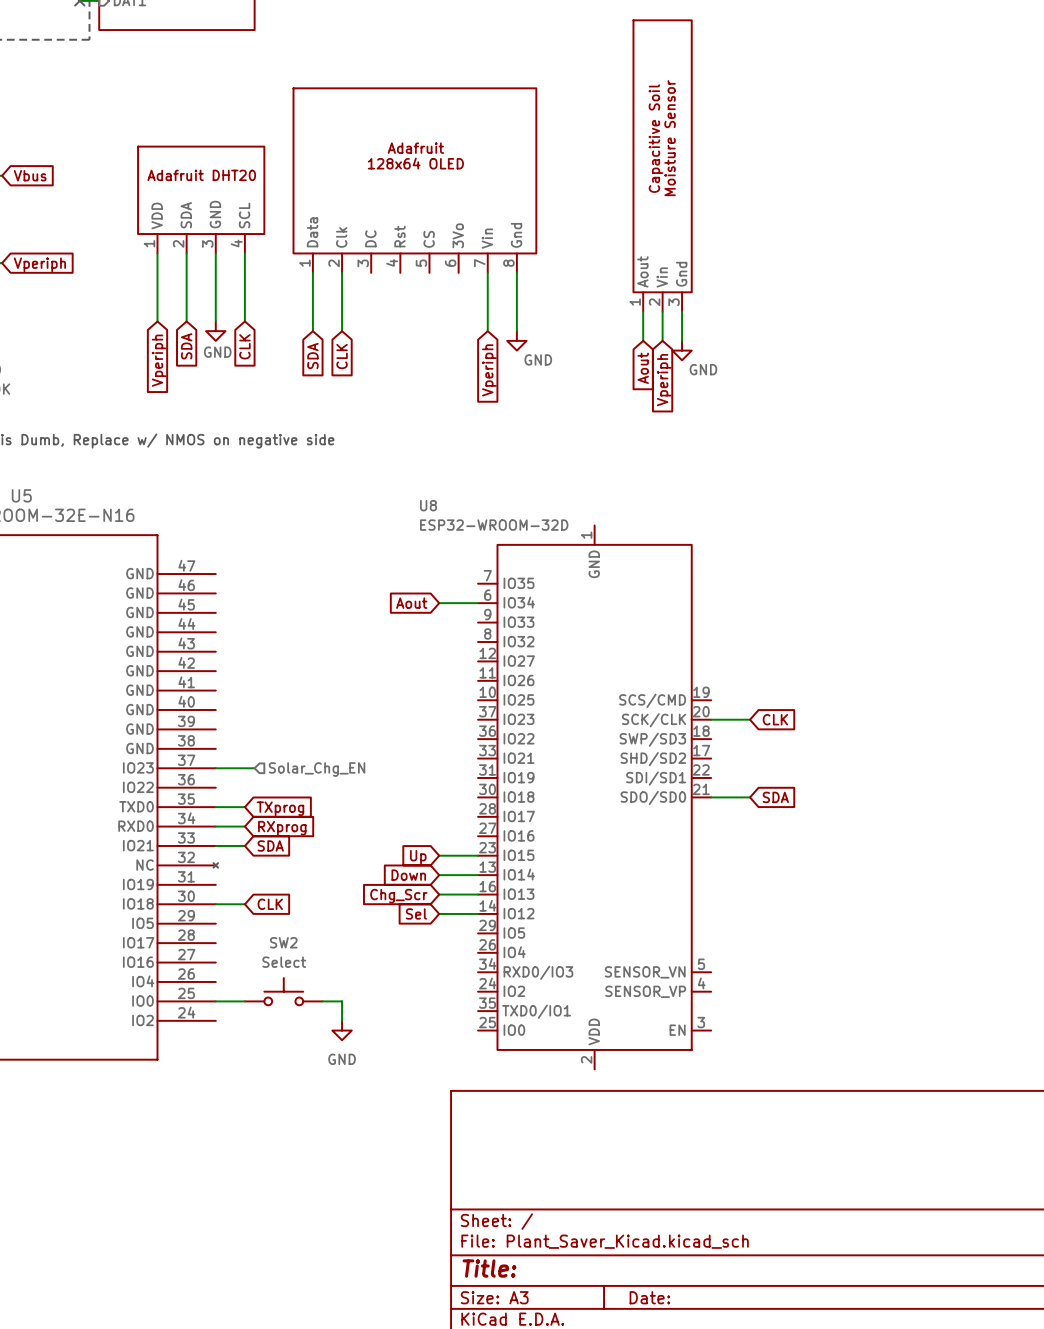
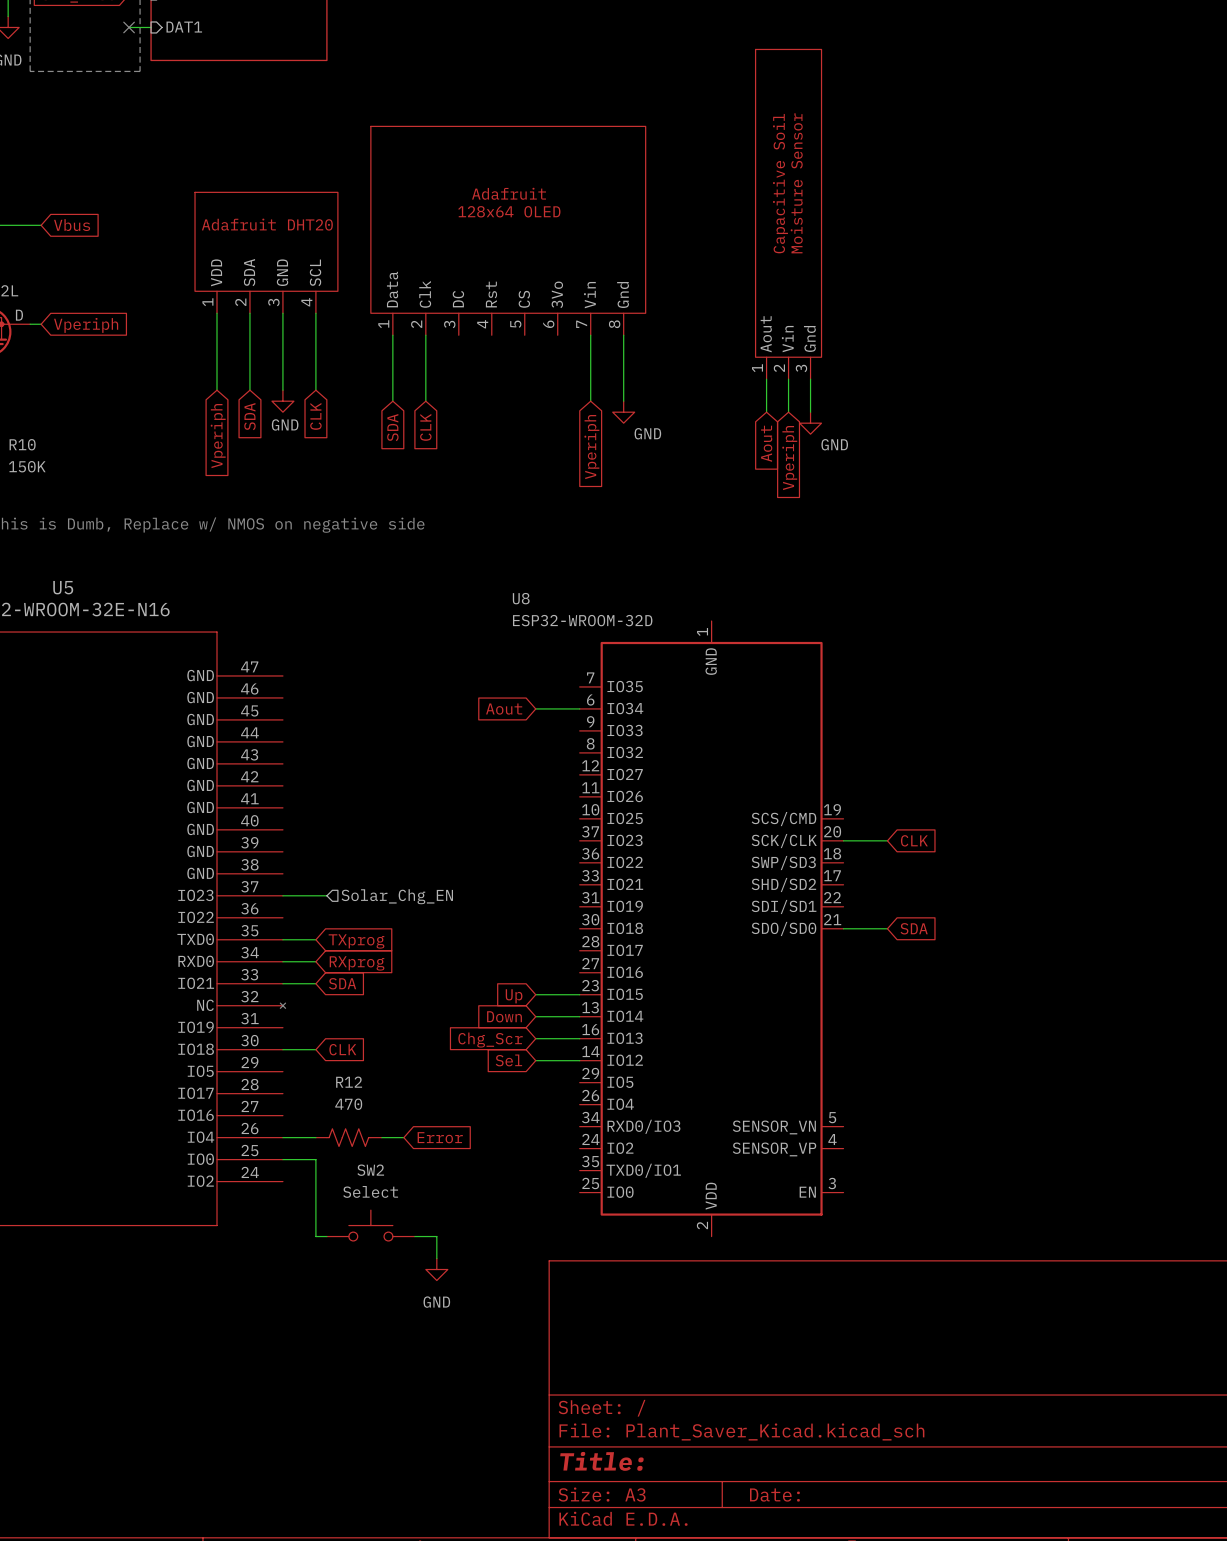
wire: none -> (282, 1137) (315, 1137)
R12: none -> 470 (348, 1137)
wire: none -> (381, 1137) (403, 1137)
global label: none -> Error (440, 1137)
SW2 position: (283, 991) -> (370, 1225)
wire: none -> (315, 1159) (315, 1236) (326, 1236)
wire: (322, 1001) (342, 1001) (342, 1020) -> (414, 1236) (436, 1236) (436, 1258)
power symbol position: GND (342, 1030) -> GND (436, 1269)

